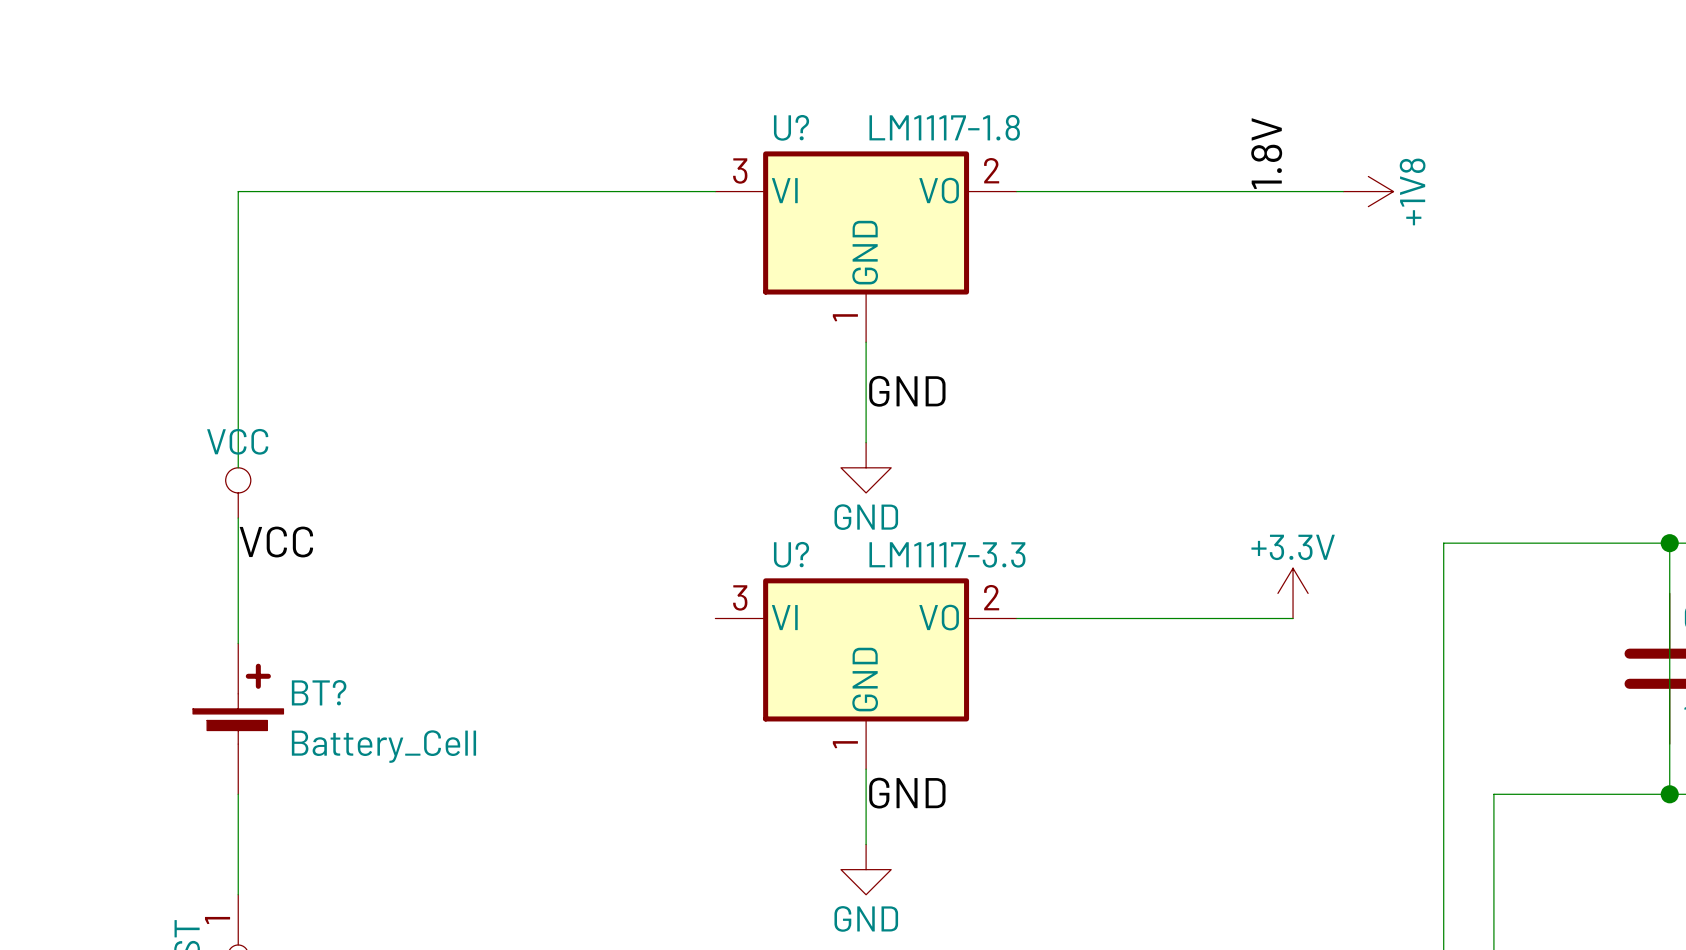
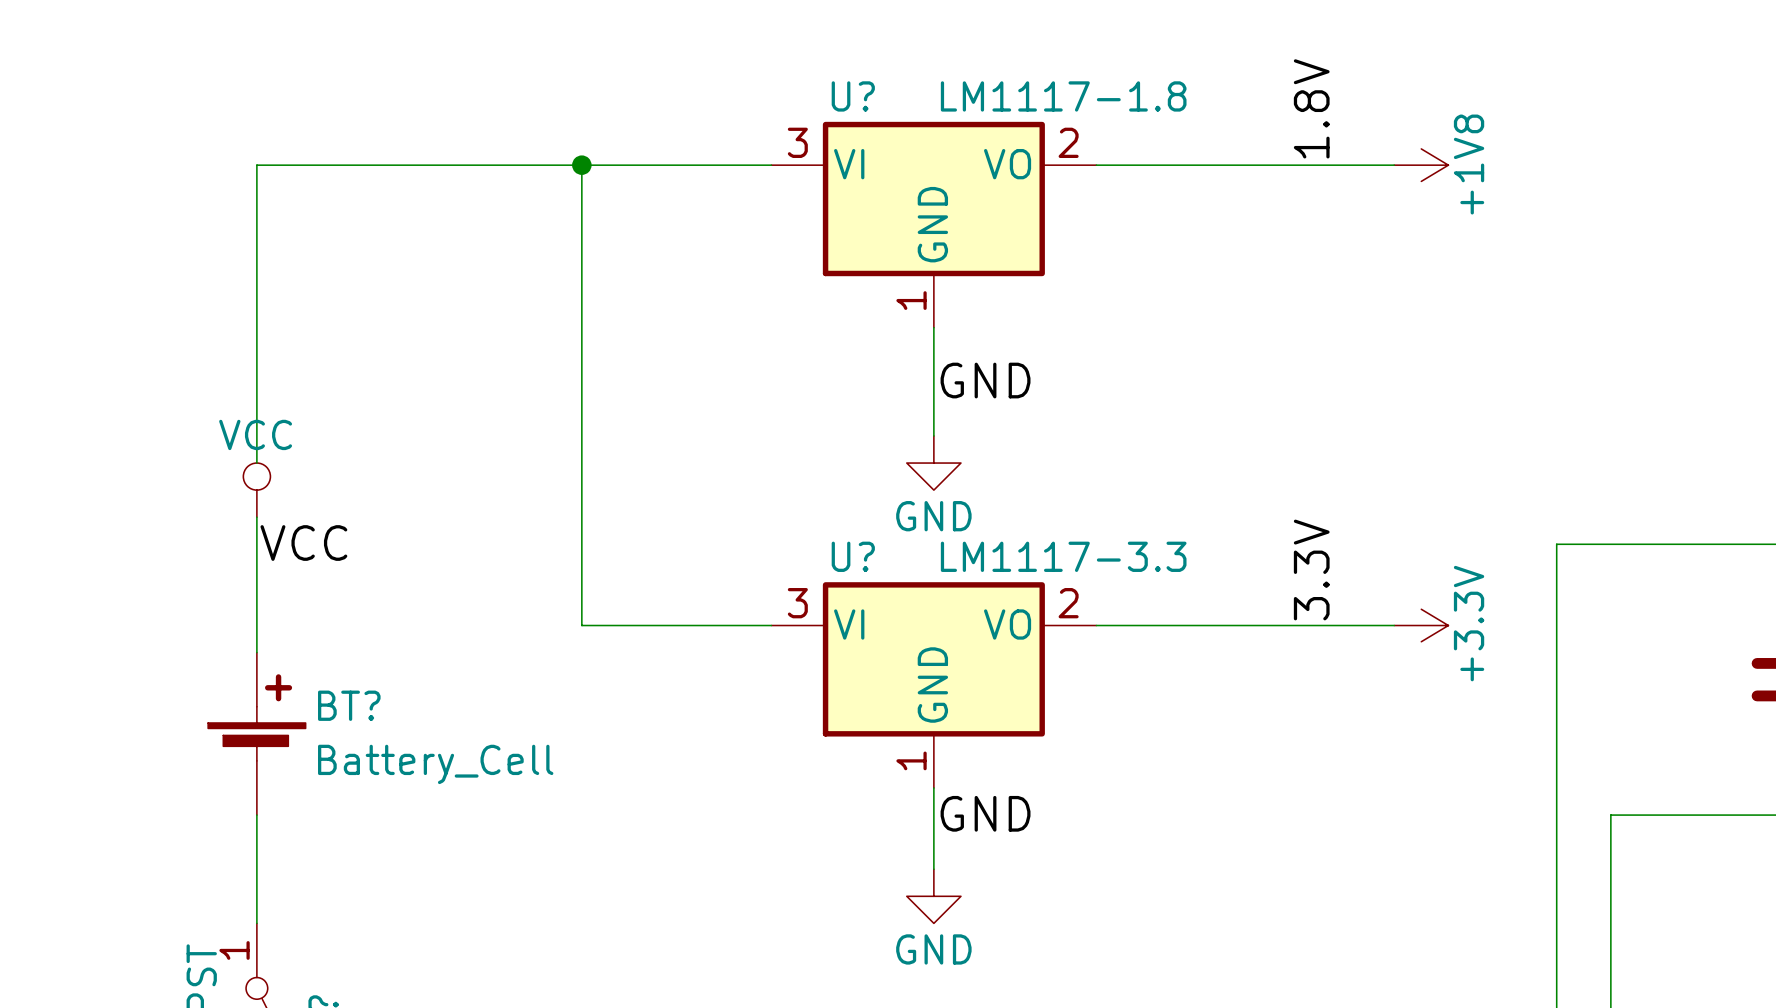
label position: 1.8V (1266, 153) -> 1.8V (1311, 108)
wire: none -> (581, 165) (581, 625) (771, 625)
junction: none -> (581, 165)
power symbol position: +1V8 (1368, 191) -> +1V8 (1421, 165)
label: none -> 3.3V (1311, 569)
power symbol rotation: 0° (1293, 593) -> 90° clockwise (1421, 625)
power symbol position: +3.3V (1293, 593) -> +3.3V (1421, 625)

